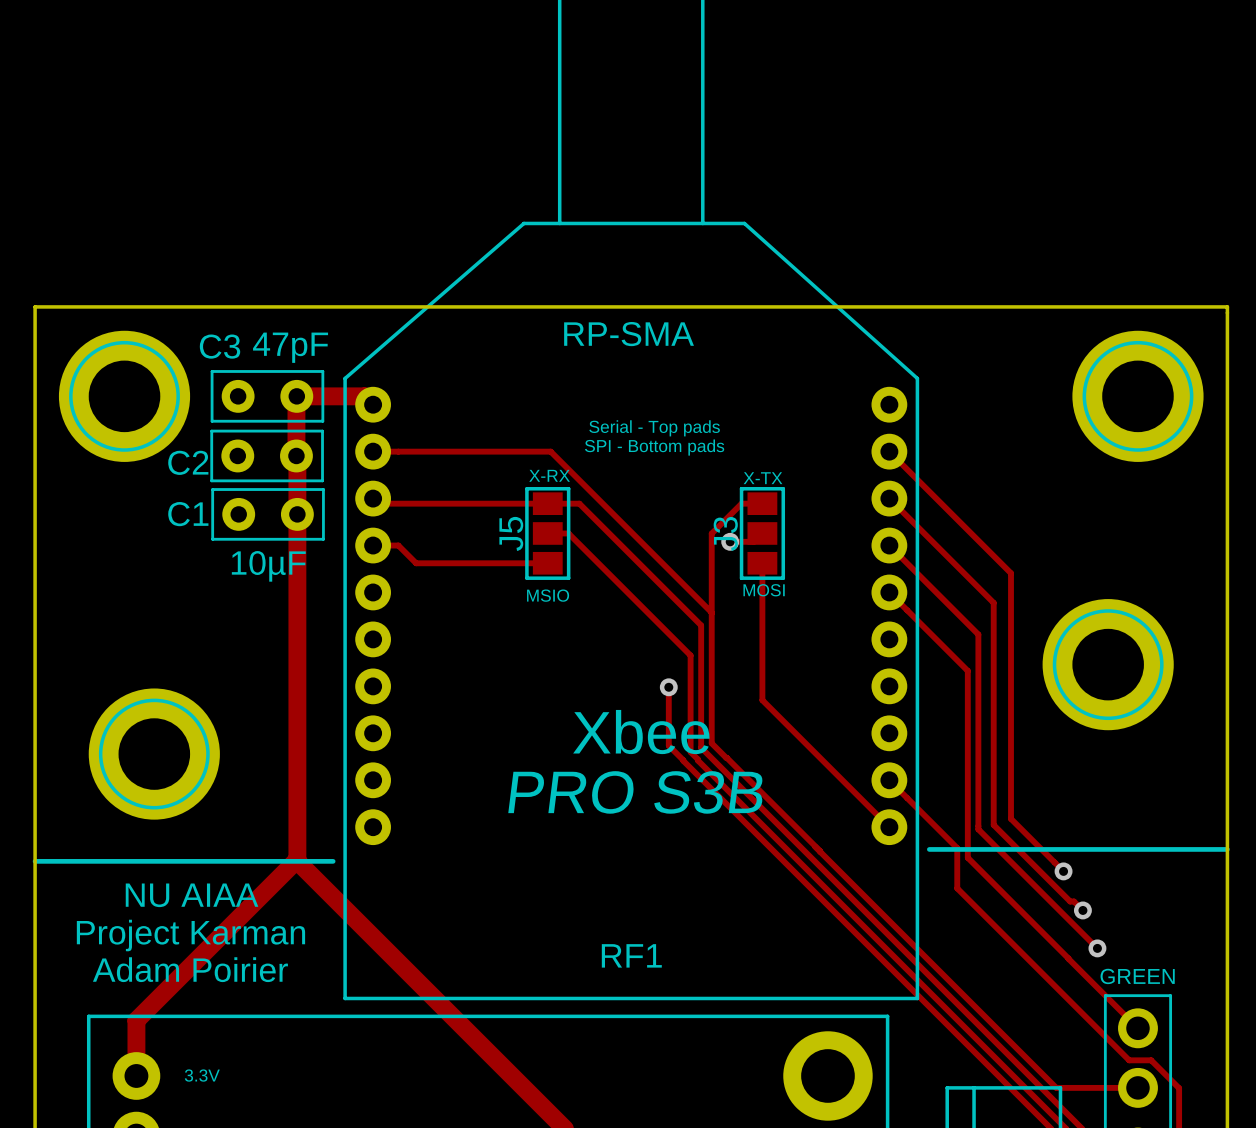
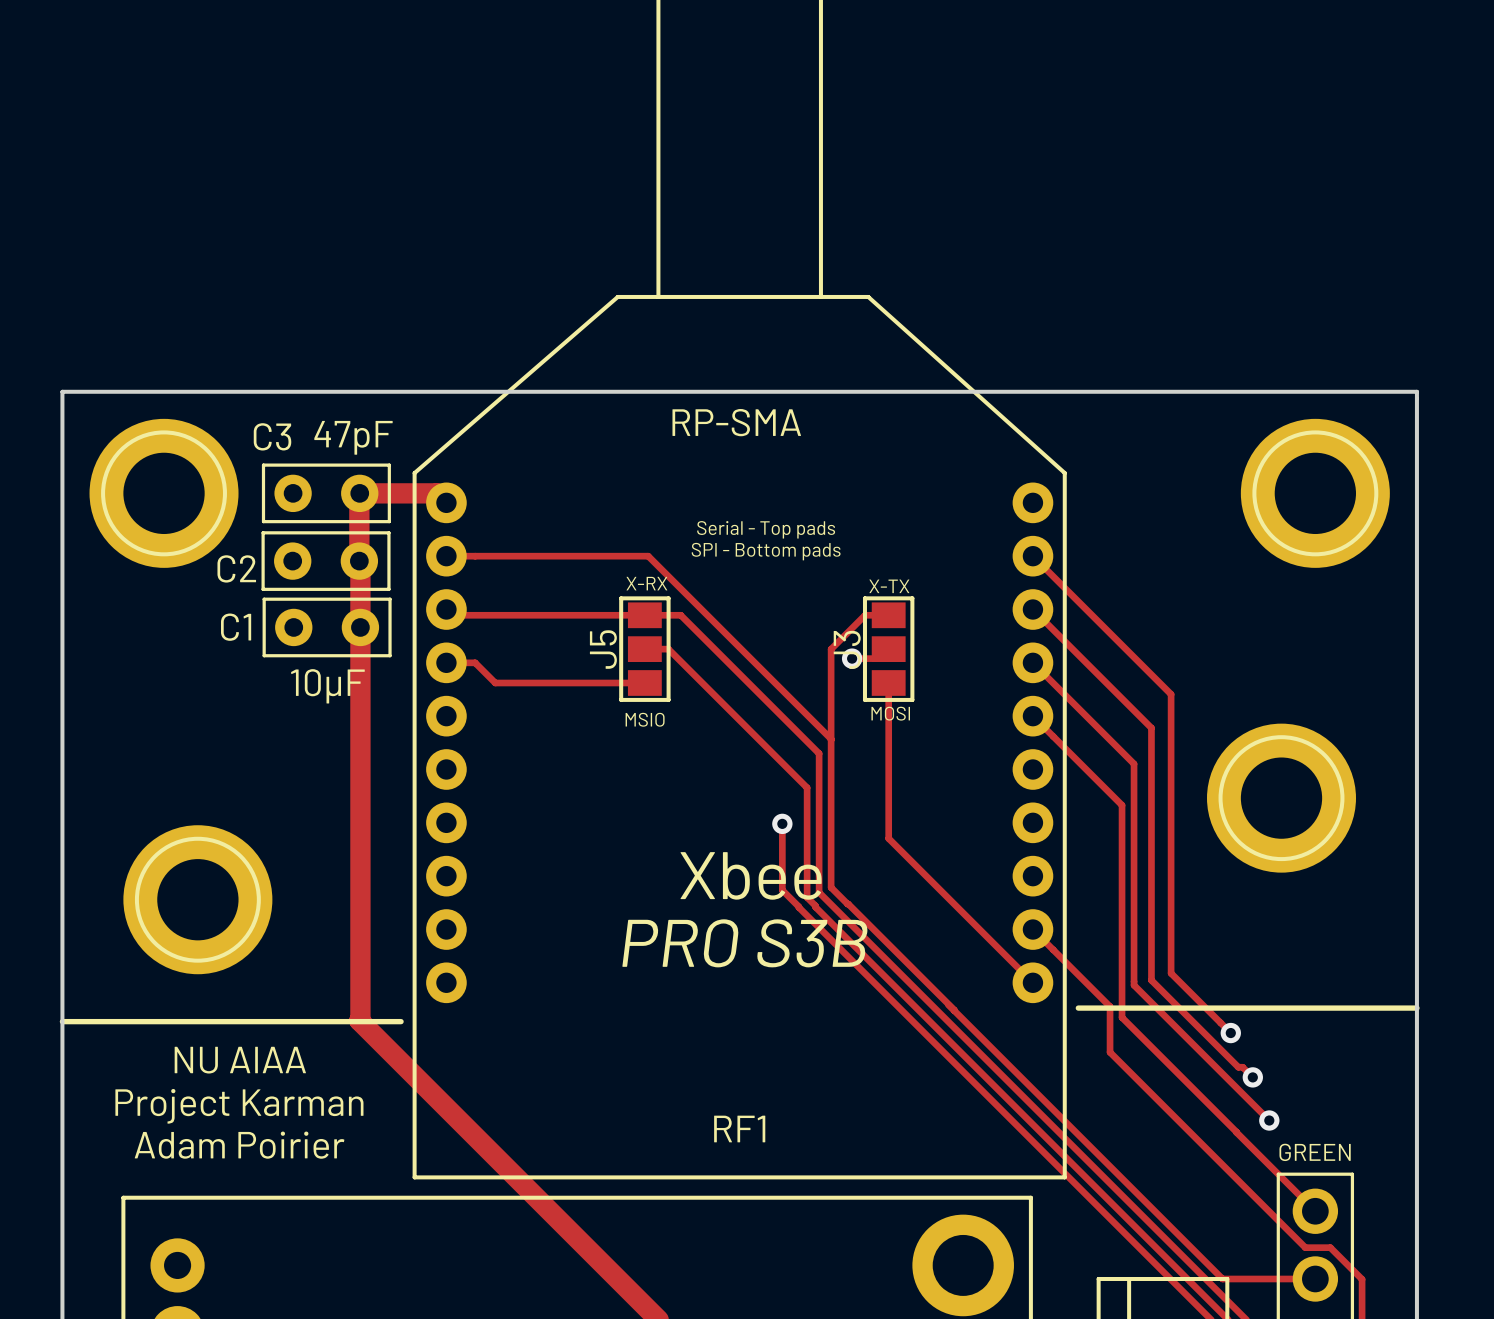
track: (296, 860) (136, 1020) (136, 1075) -> none
part text: 3.3V (202, 1075) -> none

